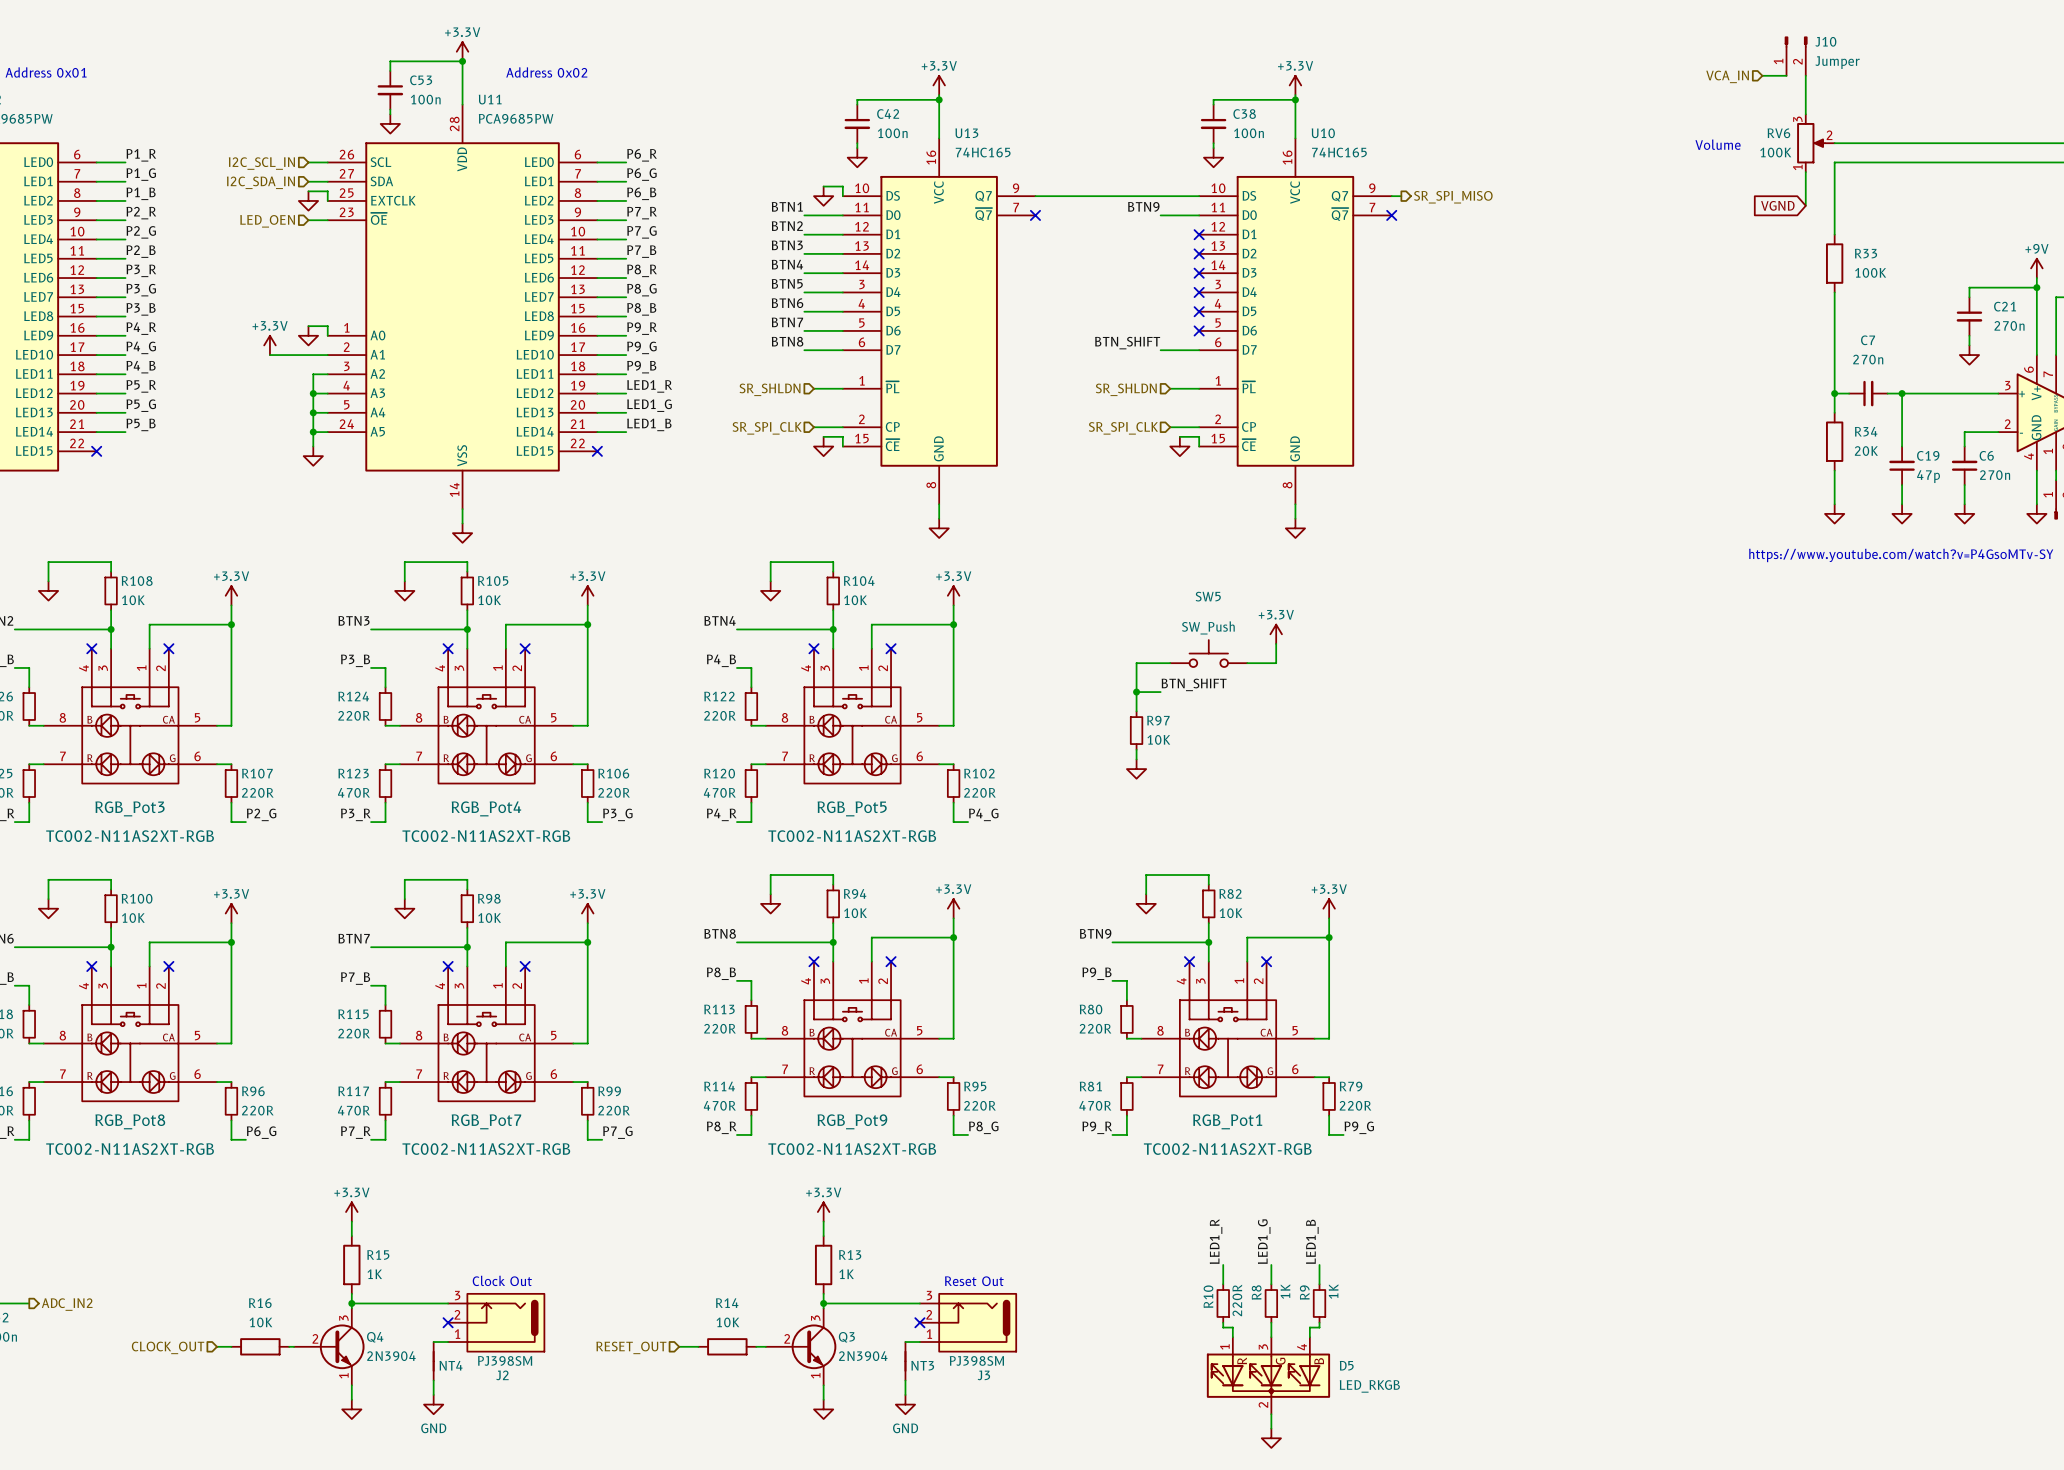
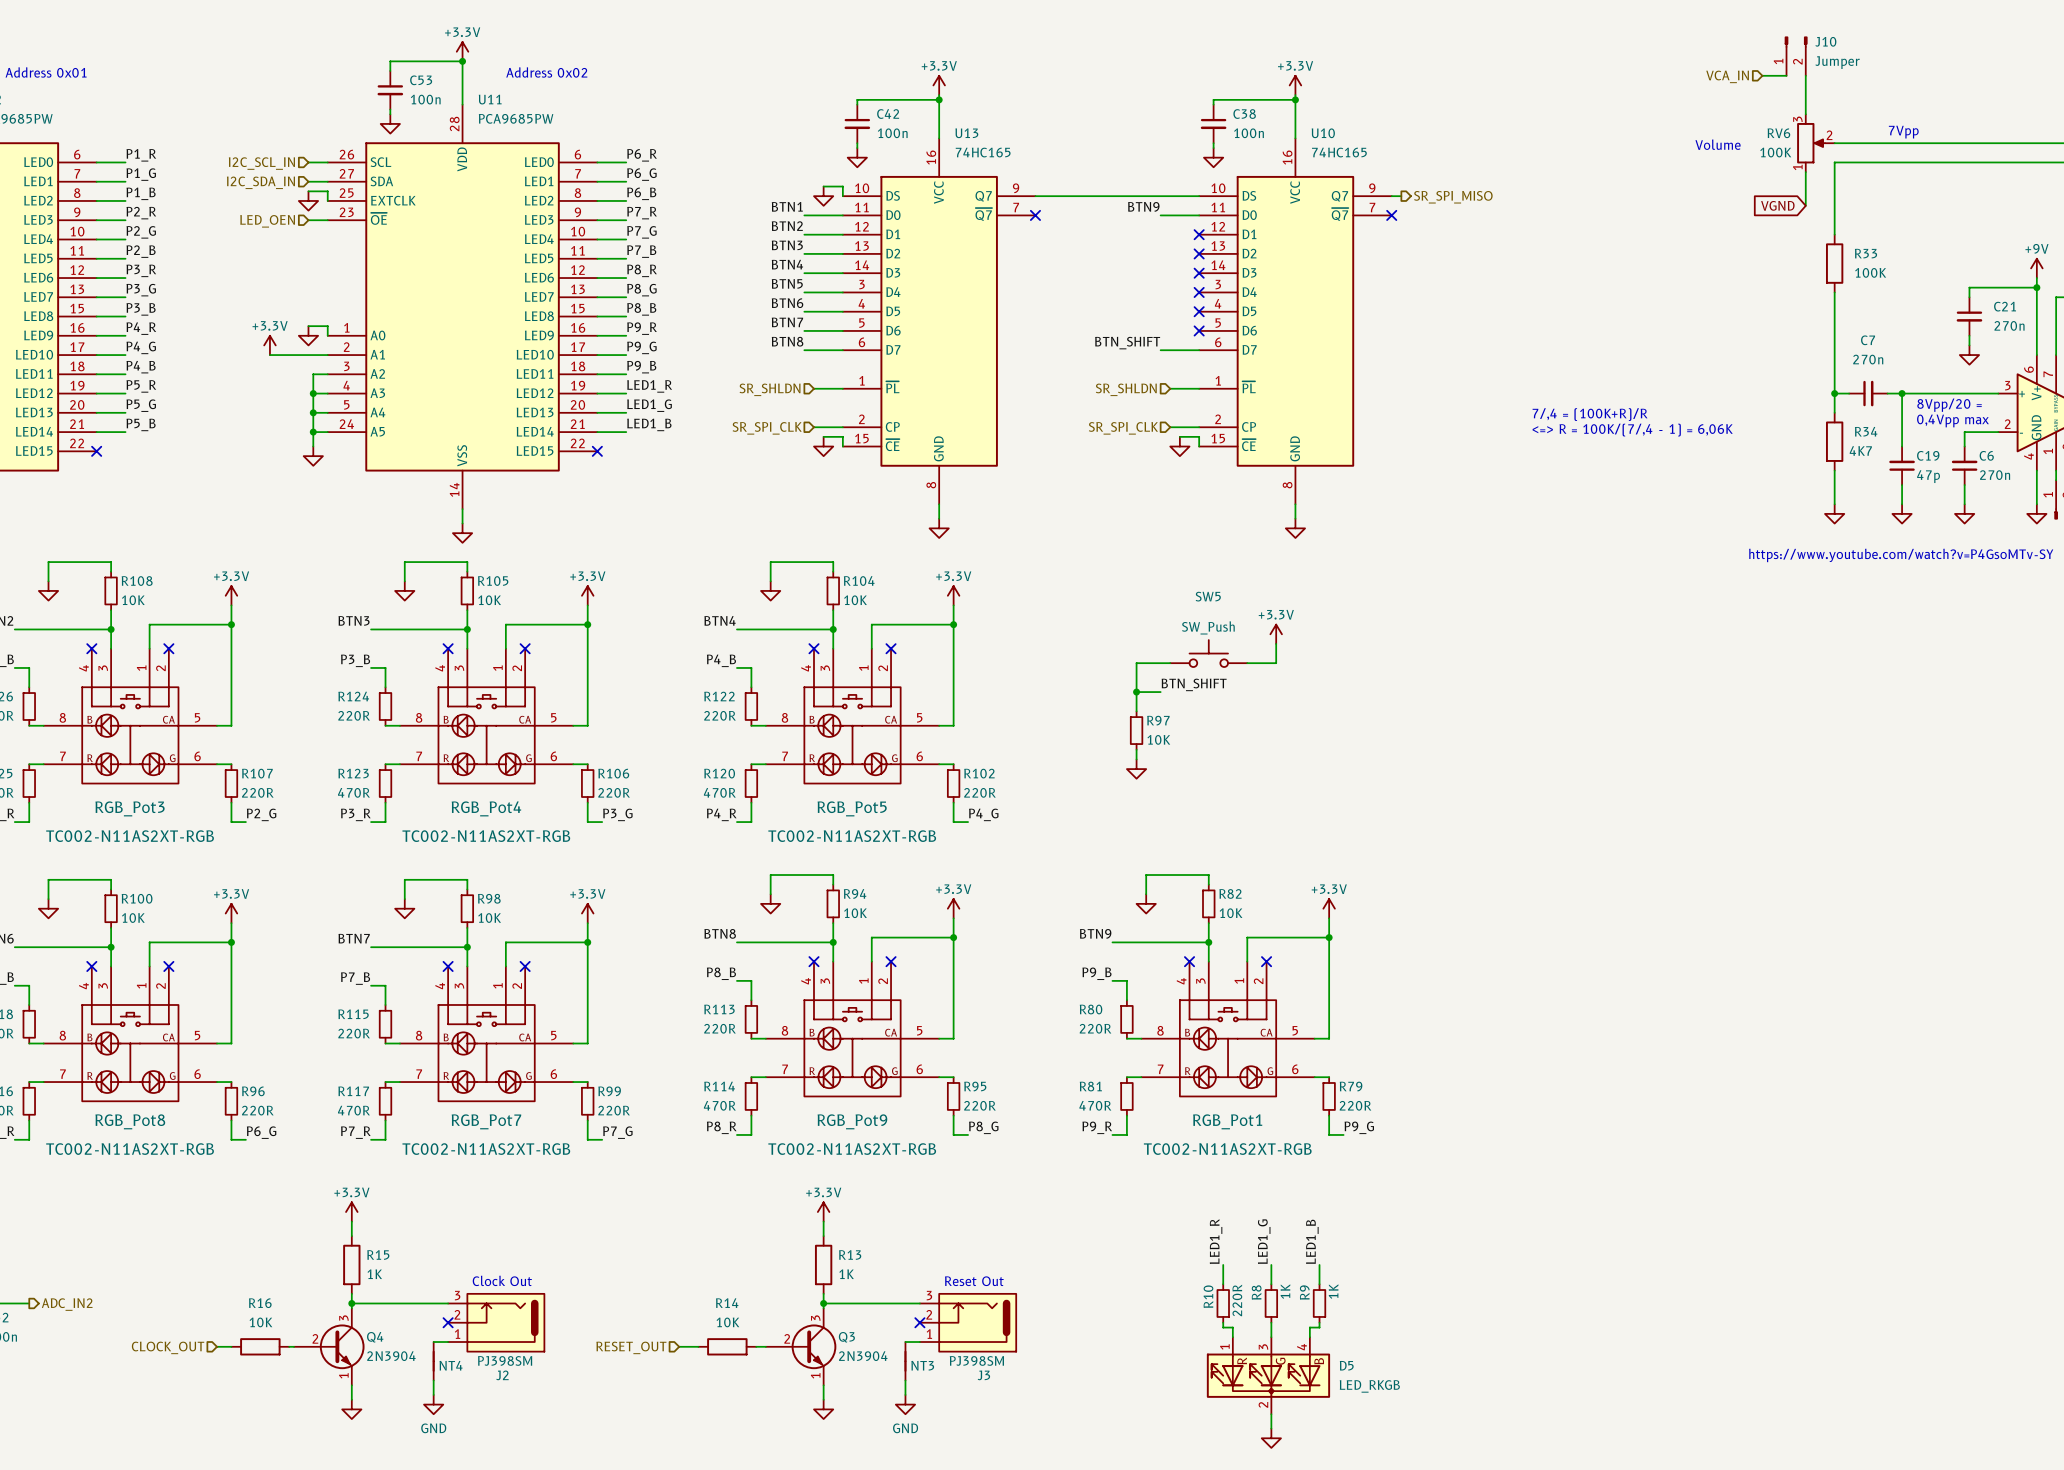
text: none -> 7Vpp (1903, 132)
text: none -> 8Vpp/20 = (1949, 405)
text: none -> 7/,4 = (100K+R)/R (1590, 414)
text: none -> 0,4Vpp max (1952, 420)
text: none -> <=> R = 100K/(7/,4 - 1) = 6,06K (1632, 430)
R34 value: 20K (1866, 451) -> 4K7 (1860, 450)

